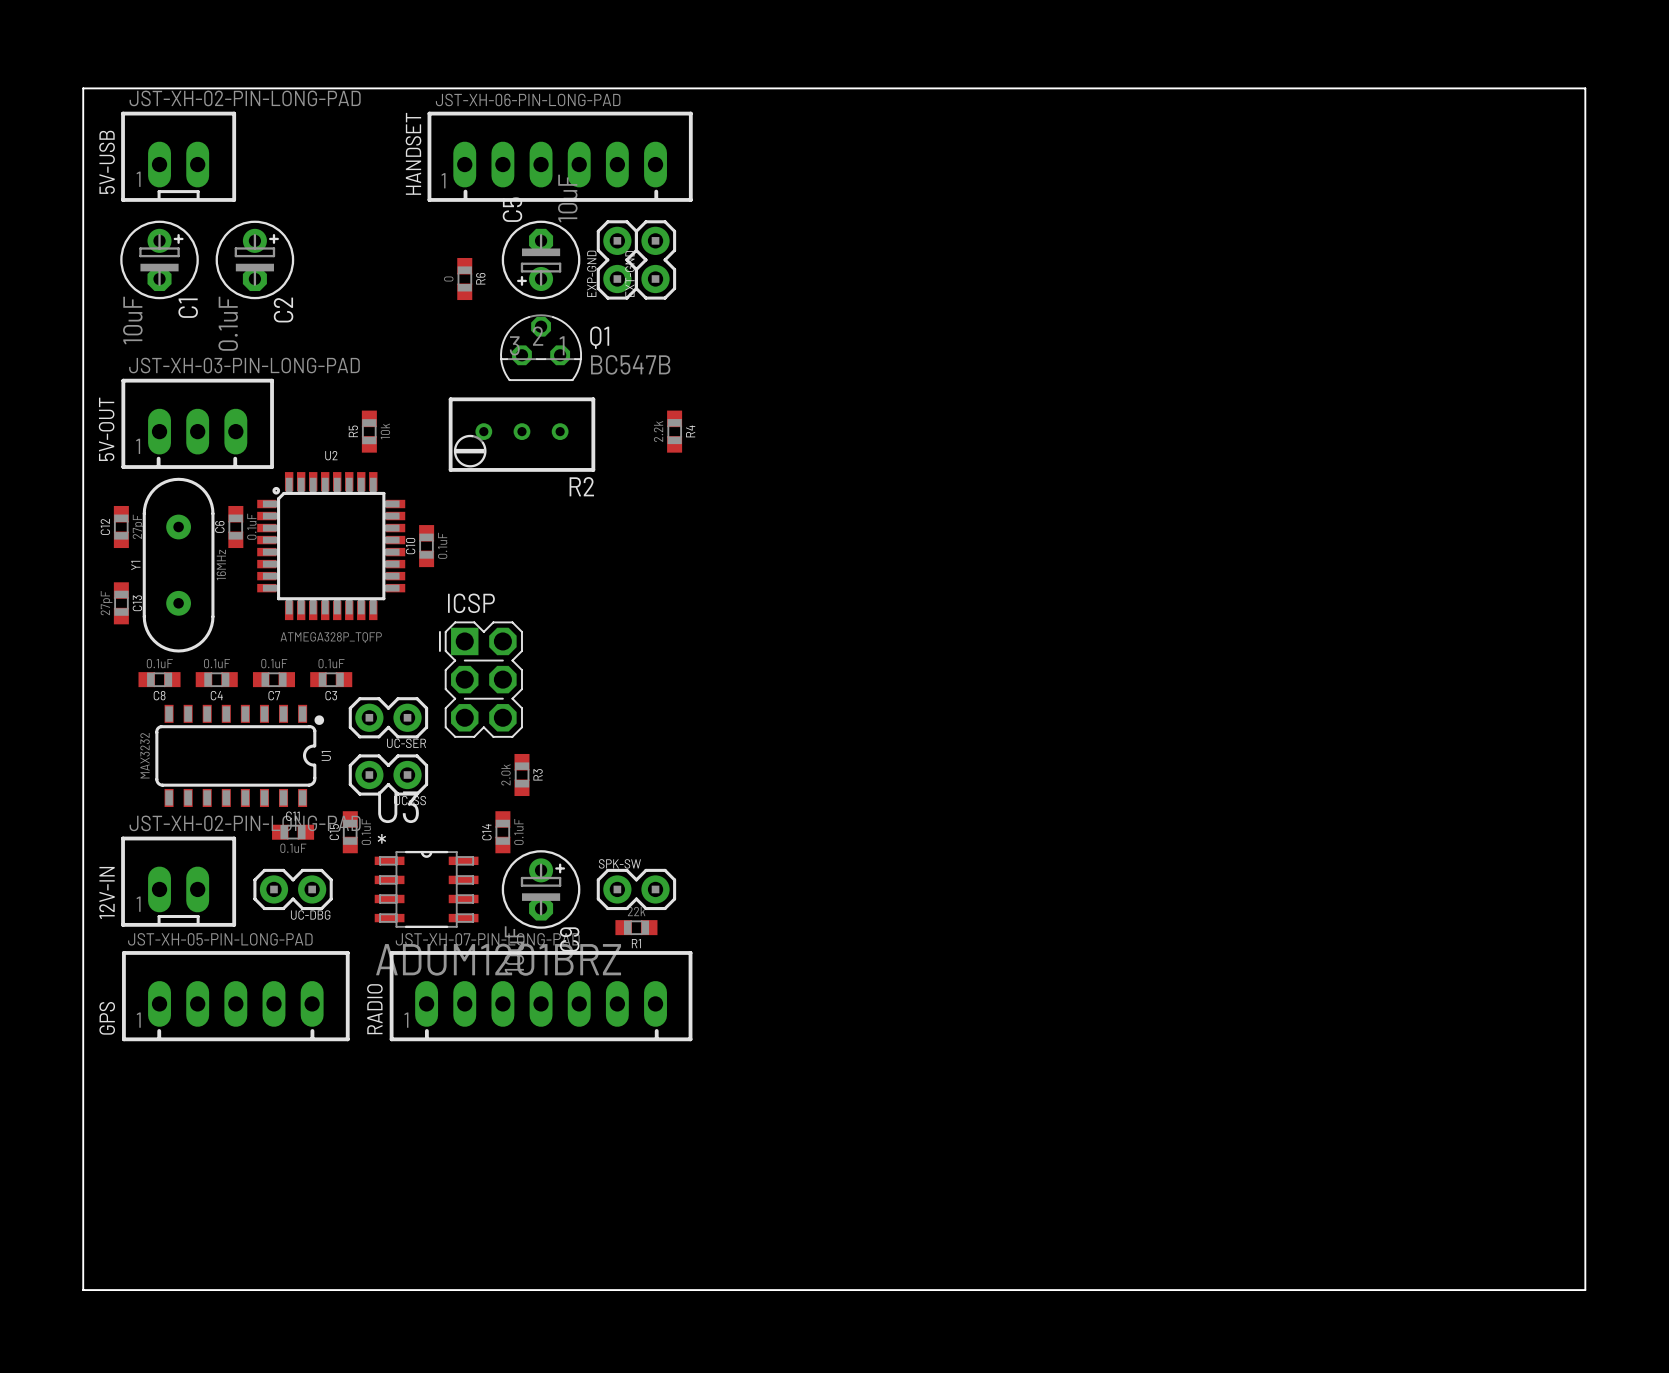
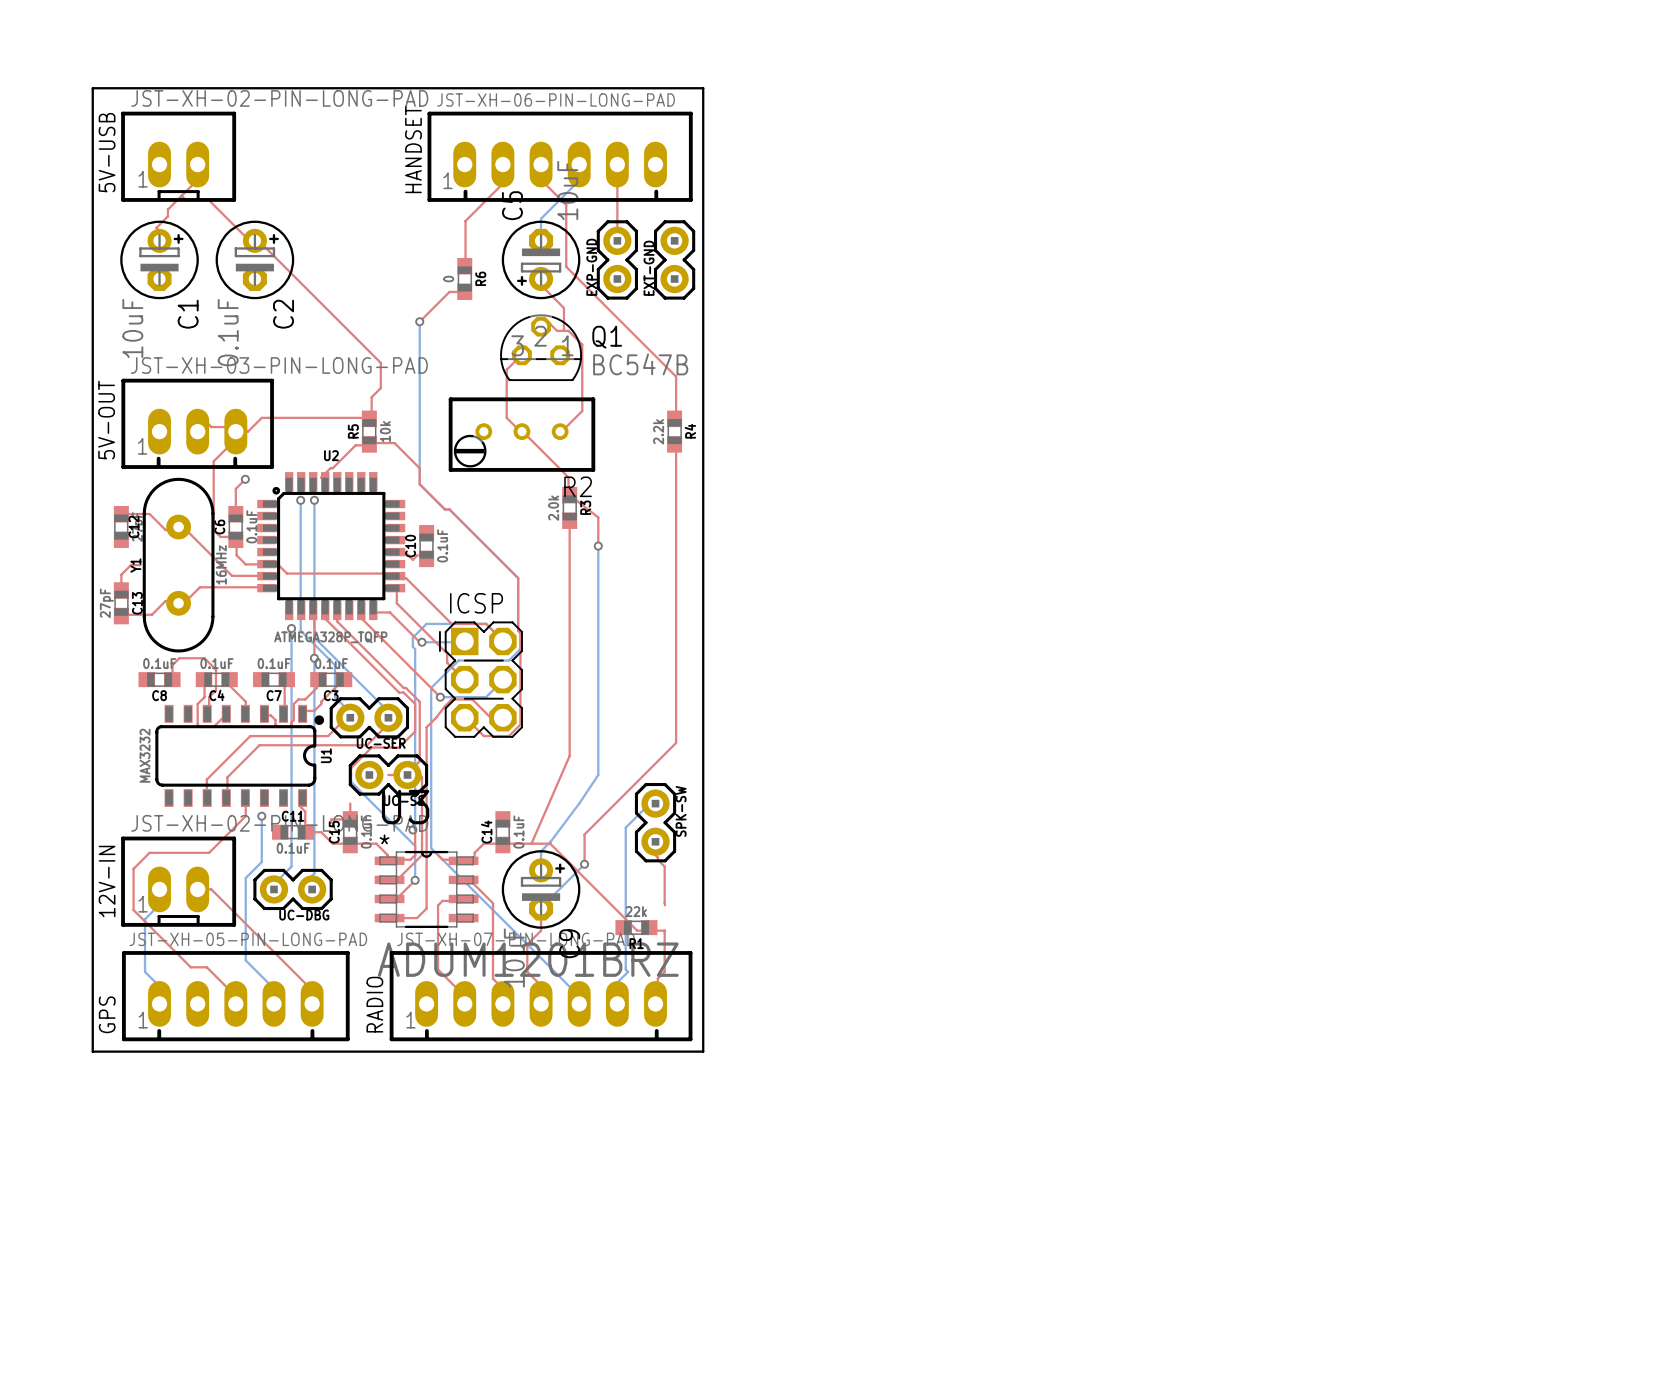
board edge: (83, 88) (1585, 88) (1585, 1290) (83, 1290) (83, 88) -> none
board edge: none -> (92, 88) (703, 88) (703, 1051) (92, 1051) (92, 88)
top track: none -> (197, 164) (197, 179) (167, 209) (167, 216) (156, 227) (158, 230) (159, 240)
top track: none -> (502, 164) (502, 184) (465, 221) (464, 266)
top track: none -> (541, 164) (541, 179) (566, 204) (566, 266) (676, 376) (674, 418)
bottom track: none -> (579, 164) (577, 182) (541, 218) (541, 240)
top track: none -> (617, 164) (617, 240)
top track: none -> (181, 195) (186, 200) (209, 200) (248, 239) (259, 241) (380, 362) (380, 388) (371, 397) (371, 415) (369, 417)
EXT-GND position: (655, 259) -> (674, 259)
top track: none -> (541, 279) (541, 285) (563, 308) (563, 330)
top track: none -> (464, 291) (449, 291) (419, 321)
bottom track: none -> (419, 321) (419, 484) (444, 509) (449, 509) (518, 578) (518, 630) (520, 633) (520, 649) (509, 660) (458, 660) (431, 688) (431, 848) (577, 994) (577, 1003) (579, 1003)
via: none -> (419, 321)
top track: none -> (541, 326) (543, 324) (550, 324) (557, 330) (568, 330) (582, 344) (582, 411) (560, 431)
top track: none -> (521, 355) (506, 369) (506, 417) (568, 477) (569, 495) (598, 517) (598, 546)
top track: none -> (369, 417) (261, 417) (248, 431) (234, 431)
top track: none -> (206, 422) (211, 427) (229, 427) (234, 431)
top track: none -> (234, 431) (234, 440) (213, 461) (213, 530) (220, 536) (232, 536) (235, 539) (236, 555) (245, 564) (277, 564) (286, 573) (392, 573) (396, 578) (406, 578) (451, 623) (486, 623) (502, 641)
top track: none -> (674, 444) (676, 445) (676, 742) (584, 834) (584, 864)
top track: none -> (321, 478) (325, 481) (321, 477) (355, 445) (394, 443) (419, 468) (419, 484) (444, 509) (449, 509) (518, 578) (520, 724) (509, 736) (483, 736) (464, 717)
top track: none -> (245, 479) (235, 488) (235, 514)
via: none -> (245, 479)
bottom track: none -> (300, 500) (300, 630) (335, 665) (335, 697) (348, 710) (350, 717)
via: none -> (300, 500)
bottom track: none -> (314, 500) (314, 637) (387, 710) (388, 717)
via: none -> (314, 500)
top track: none -> (121, 514) (149, 514) (165, 530) (183, 527) (232, 575) (266, 576)
top track: none -> (568, 520) (569, 755) (531, 843)
C12 name position: C12 (105, 526) -> C12 (133, 527)
bottom track: none -> (598, 546) (598, 775) (579, 803) (541, 851) (541, 870)
via: none -> (598, 546)
top track: none -> (395, 552) (406, 552) (412, 559) (417, 555)
top track: none -> (140, 565) (130, 565) (121, 574) (121, 590)
top track: none -> (266, 588) (199, 587) (183, 603) (165, 601) (151, 614) (121, 616)
top track: none -> (395, 588) (396, 603) (447, 653) (447, 662) (464, 679)
top track: none -> (313, 610) (314, 658)
top track: none -> (325, 610) (325, 619) (399, 692) (403, 692) (415, 704) (415, 731) (399, 747) (371, 747) (351, 768) (350, 775)
top track: none -> (337, 610) (337, 621) (419, 701) (419, 761) (408, 772) (388, 775)
top track: none -> (361, 610) (362, 619) (440, 697)
top track: none -> (373, 610) (373, 612) (389, 612) (419, 642) (422, 642)
bottom track: none -> (291, 628) (291, 866) (275, 882) (273, 889)
via: none -> (291, 628)
bottom track: none -> (464, 641) (422, 642)
bottom track: none -> (502, 641) (486, 623) (426, 623) (412, 637) (412, 646) (415, 649) (415, 827) (412, 829)
via: none -> (422, 642)
bottom track: none -> (314, 658) (314, 873) (312, 875) (312, 889)
via: none -> (314, 658)
top track: none -> (172, 679) (172, 665) (179, 658) (204, 658) (215, 669) (215, 690) (209, 697) (209, 713) (207, 713)
top track: none -> (203, 679) (204, 697) (197, 704) (197, 724) (199, 726) (213, 726) (226, 713)
top track: none -> (229, 679) (229, 685) (245, 701) (245, 713)
top track: none -> (286, 679) (284, 681) (283, 713)
top track: none -> (318, 679) (316, 688) (305, 699) (298, 699) (293, 704) (293, 720) (289, 726) (277, 726) (275, 720) (270, 715) (264, 713)
top track: none -> (343, 679) (314, 710) (305, 710) (302, 713)
bottom track: none -> (502, 679) (486, 697) (440, 697)
via: none -> (440, 697)
top track: none -> (350, 717) (346, 717) (328, 736) (250, 736) (206, 779) (207, 797)
top track: none -> (388, 717) (387, 724) (367, 745) (259, 745) (227, 777) (226, 797)
UC-SER position: (388, 717) -> (369, 717)
top track: none -> (502, 717) (490, 717) (472, 699) (451, 699) (426, 727) (426, 908) (417, 918) (389, 918)
top track: none -> (412, 768) (422, 777) (422, 855) (399, 878) (389, 878) (389, 879)
bottom track: none -> (350, 775) (351, 781) (415, 845) (415, 880)
R3 position: (521, 775) -> (569, 507)
top track: none -> (245, 797) (245, 816) (209, 852) (149, 852) (133, 868) (133, 910) (190, 967) (206, 967) (234, 994) (234, 1003) (235, 1003)
top track: none -> (302, 797) (300, 807) (305, 811) (305, 832) (321, 832) (332, 843) (376, 843) (387, 855) (389, 860) (410, 859) (415, 855) (415, 832) (412, 829)
top track: none -> (350, 803) (350, 819) (331, 819) (331, 822)
bottom track: none -> (655, 803) (648, 804) (625, 827) (625, 969) (628, 971) (618, 981) (618, 1003) (617, 1003)
bottom track: none -> (261, 816) (261, 861) (245, 878) (245, 960) (273, 987) (273, 1003)
via: none -> (261, 816)
via: none -> (412, 829)
top track: none -> (655, 841) (655, 855) (664, 866) (665, 905)
top track: none -> (438, 855) (442, 859) (463, 860) (472, 859) (474, 852) (483, 843) (550, 843) (637, 930) (665, 930) (664, 971) (657, 978) (657, 1001) (655, 1003)
bottom track: none -> (584, 864) (541, 908)
via: none -> (584, 864)
top track: none -> (463, 879) (470, 880) (492, 903) (492, 978) (502, 987) (502, 1003)
top track: none -> (415, 880) (396, 898) (389, 899)
via: none -> (415, 880)
bottom track: none -> (159, 889) (158, 905) (145, 919) (145, 971) (158, 985) (159, 1003)
top track: none -> (197, 889) (211, 889) (312, 990) (312, 1003)
SPK-SW rotation: 0° (636, 889) -> 90° clockwise (655, 822)
SPK-SW position: (636, 889) -> (655, 822)
top track: none -> (463, 899) (463, 900) (442, 900) (438, 905) (438, 969) (463, 994) (463, 1003) (464, 1003)
top track: none -> (541, 908) (541, 930) (527, 944) (527, 971) (541, 985) (541, 1003)

